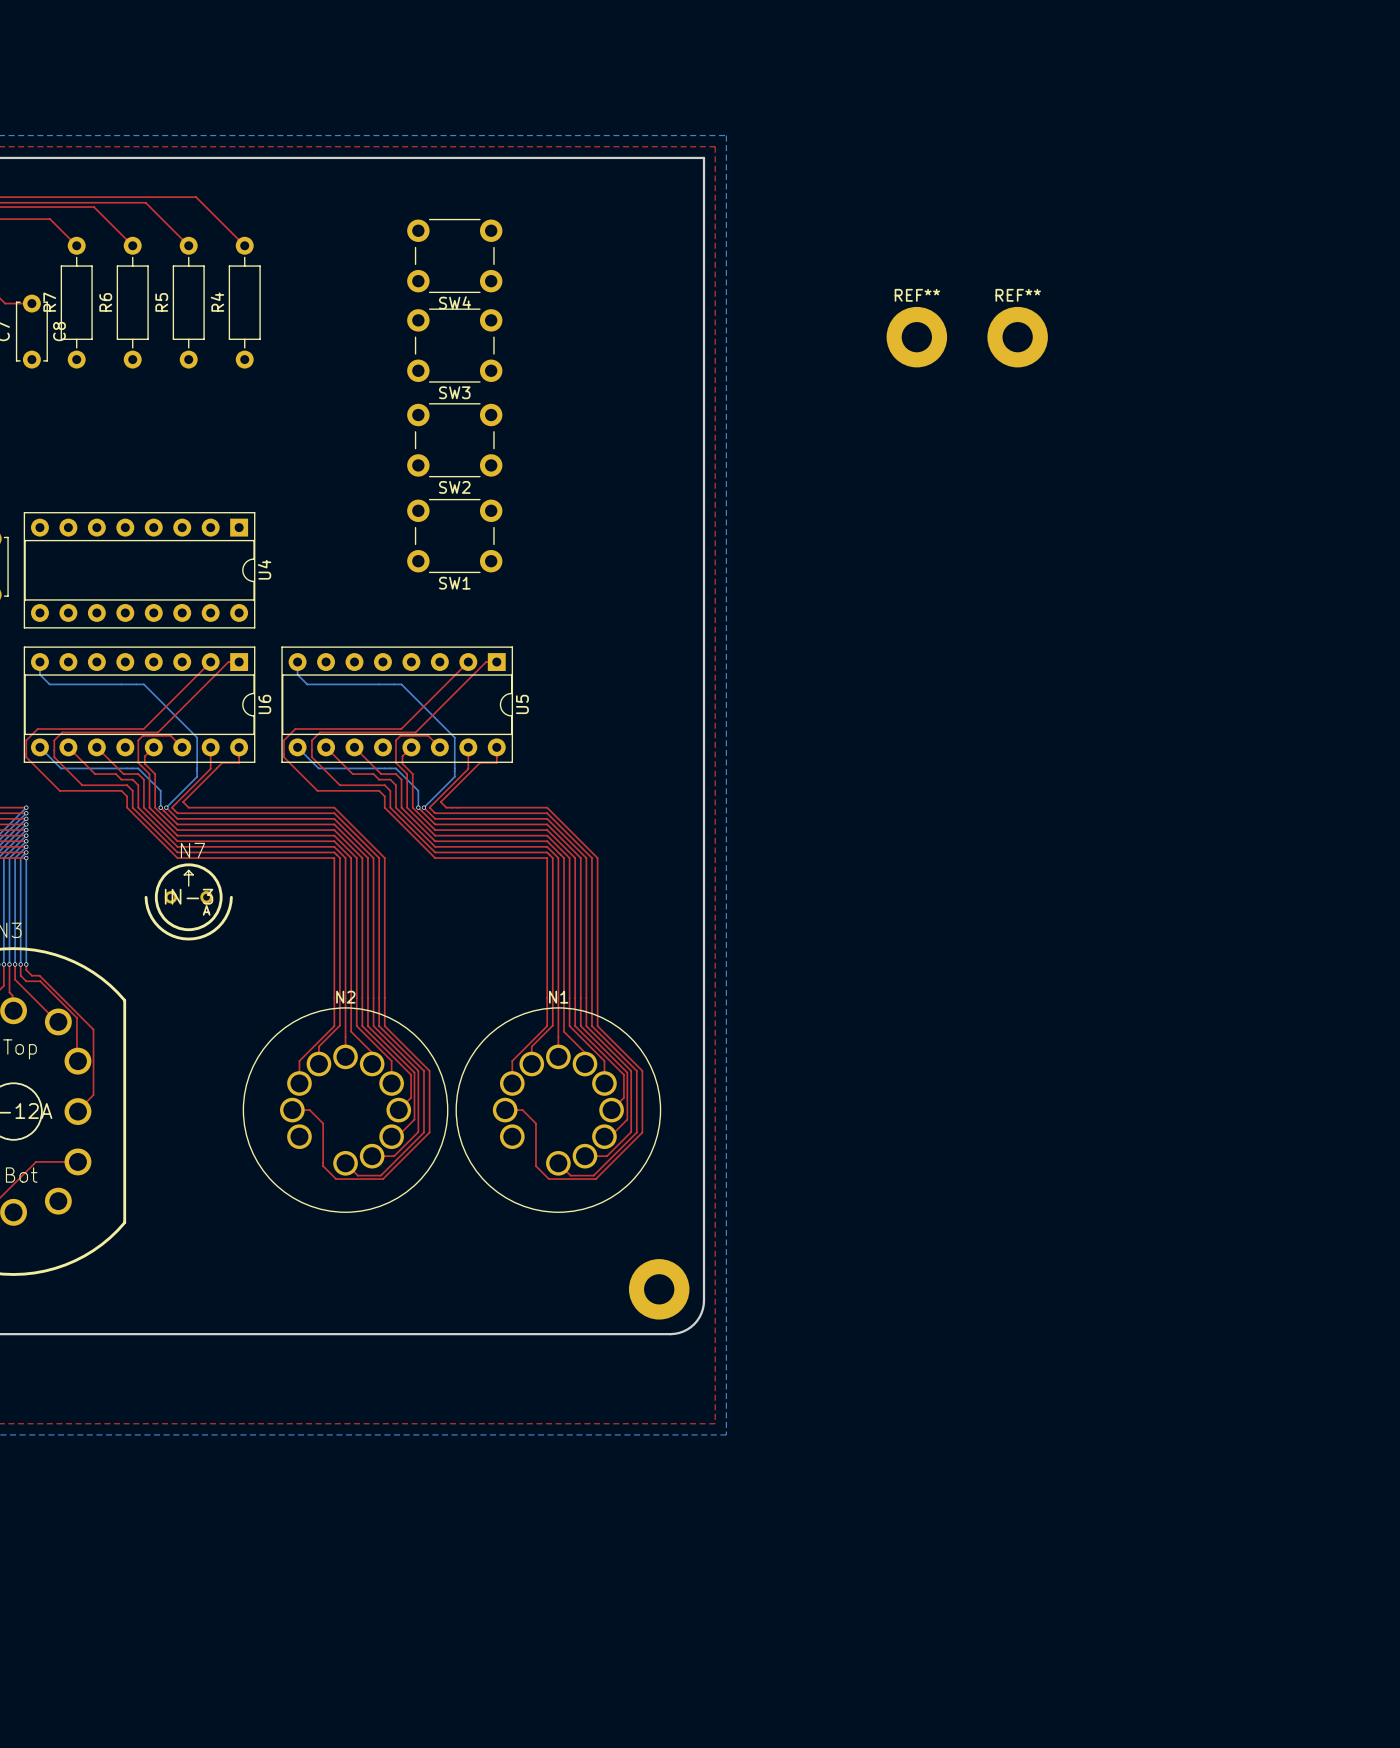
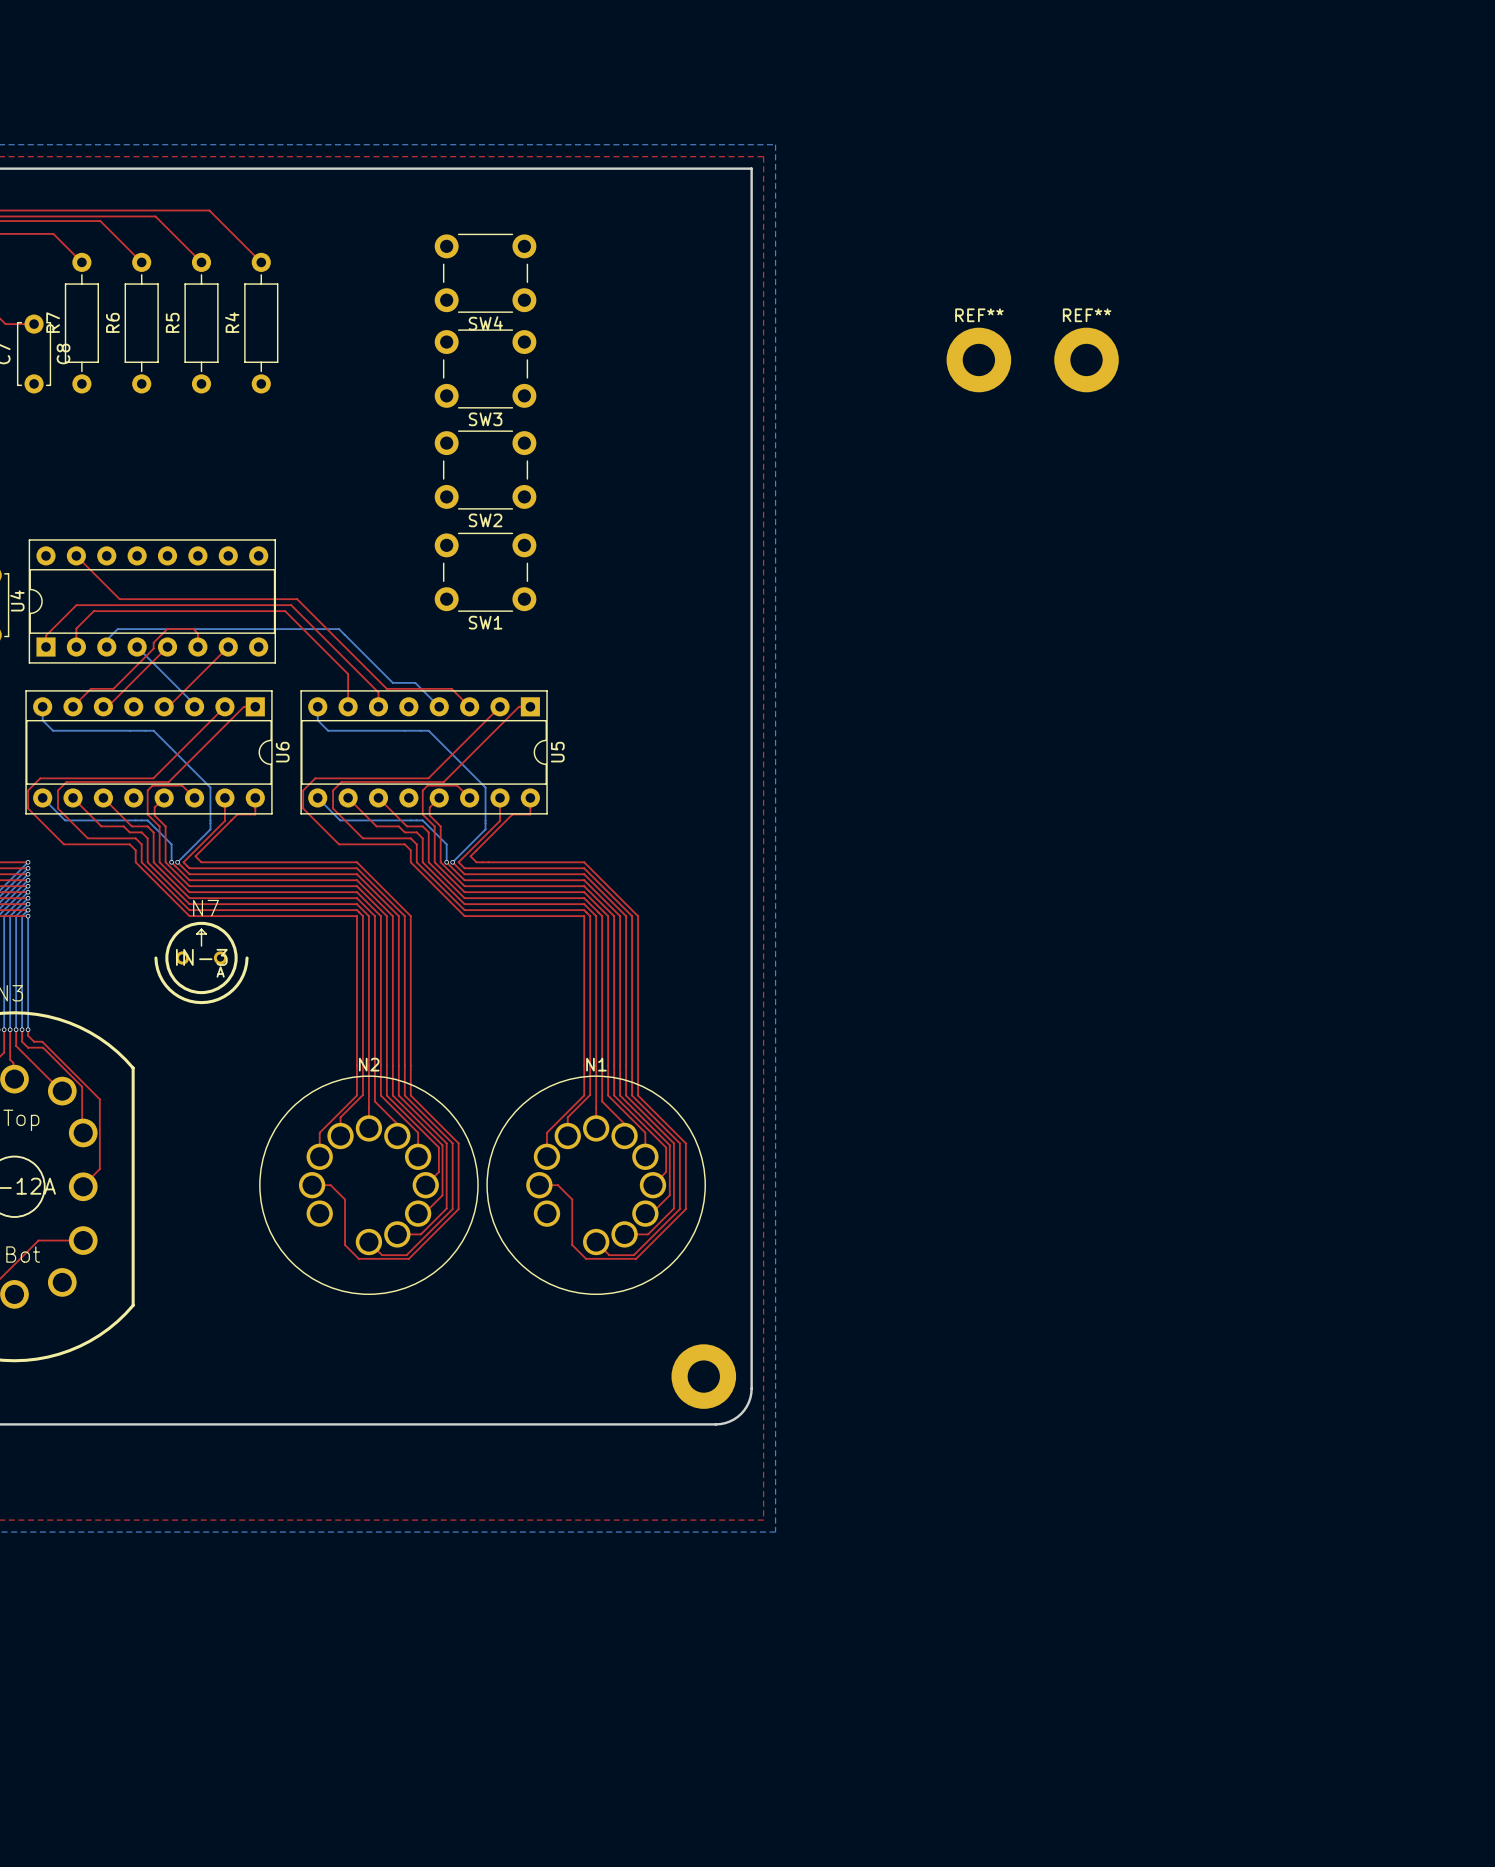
top track: none -> (76, 555) (119, 599) (297, 599) (386, 688) (451, 688) (469, 706)
U4 rotation: 0° (139, 570) -> 180° (152, 601)
top track: none -> (46, 647) (46, 635) (76, 605) (291, 605) (378, 692) (378, 706)
top track: none -> (76, 647) (76, 628) (93, 611) (285, 611) (348, 674) (348, 706)
bottom track: none -> (106, 647) (106, 640) (117, 629) (339, 629) (392, 682) (415, 682) (439, 706)
bottom track: none -> (137, 647) (194, 704) (194, 706)
top track: none -> (167, 647) (107, 706) (103, 706)
top track: none -> (197, 647) (197, 633) (193, 629) (167, 629) (153, 642) (153, 648) (113, 688) (90, 688) (73, 706)
top track: none -> (228, 647) (168, 706) (164, 706)

